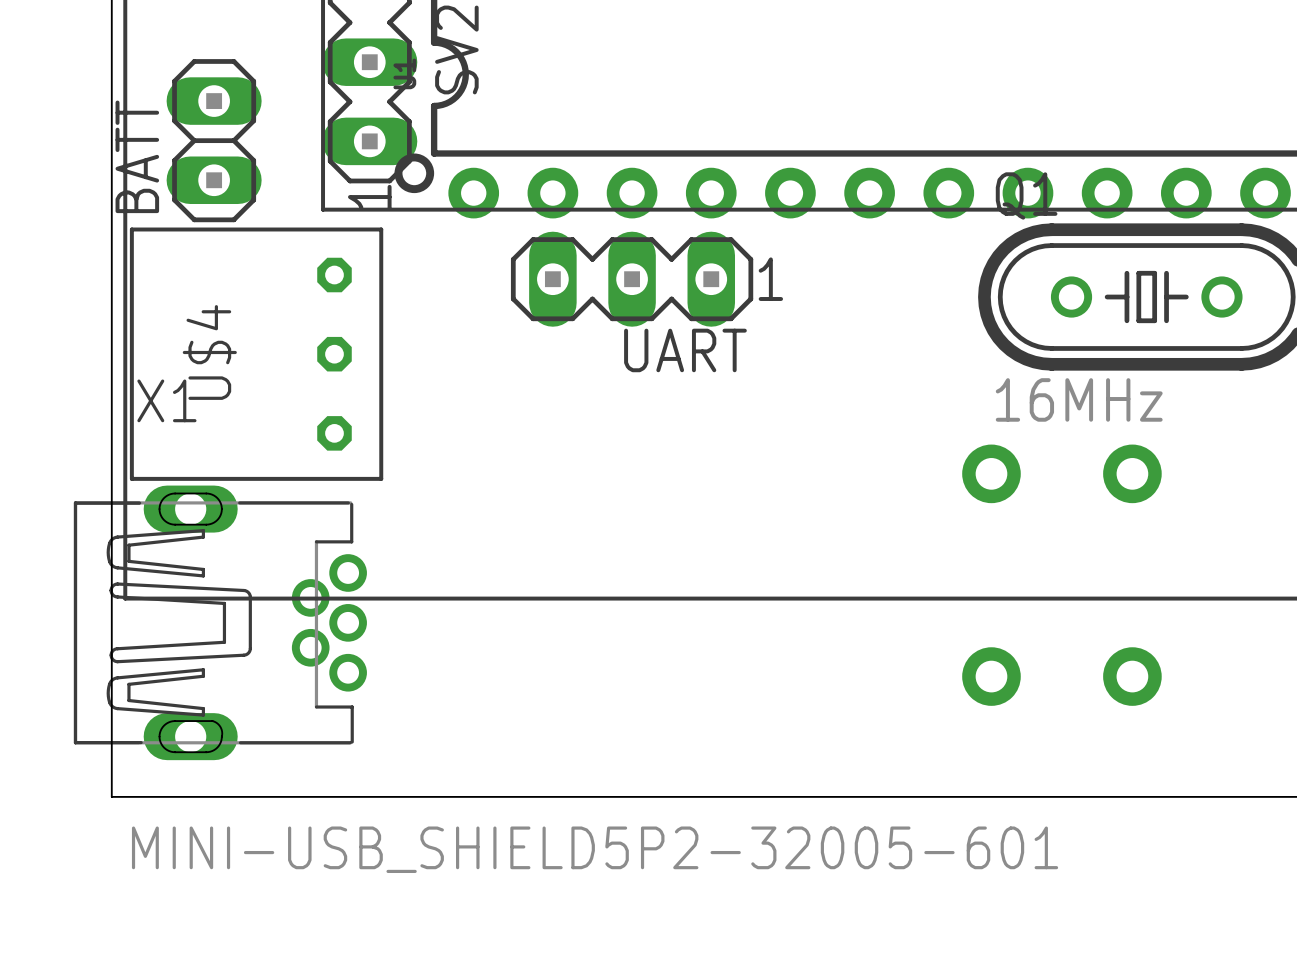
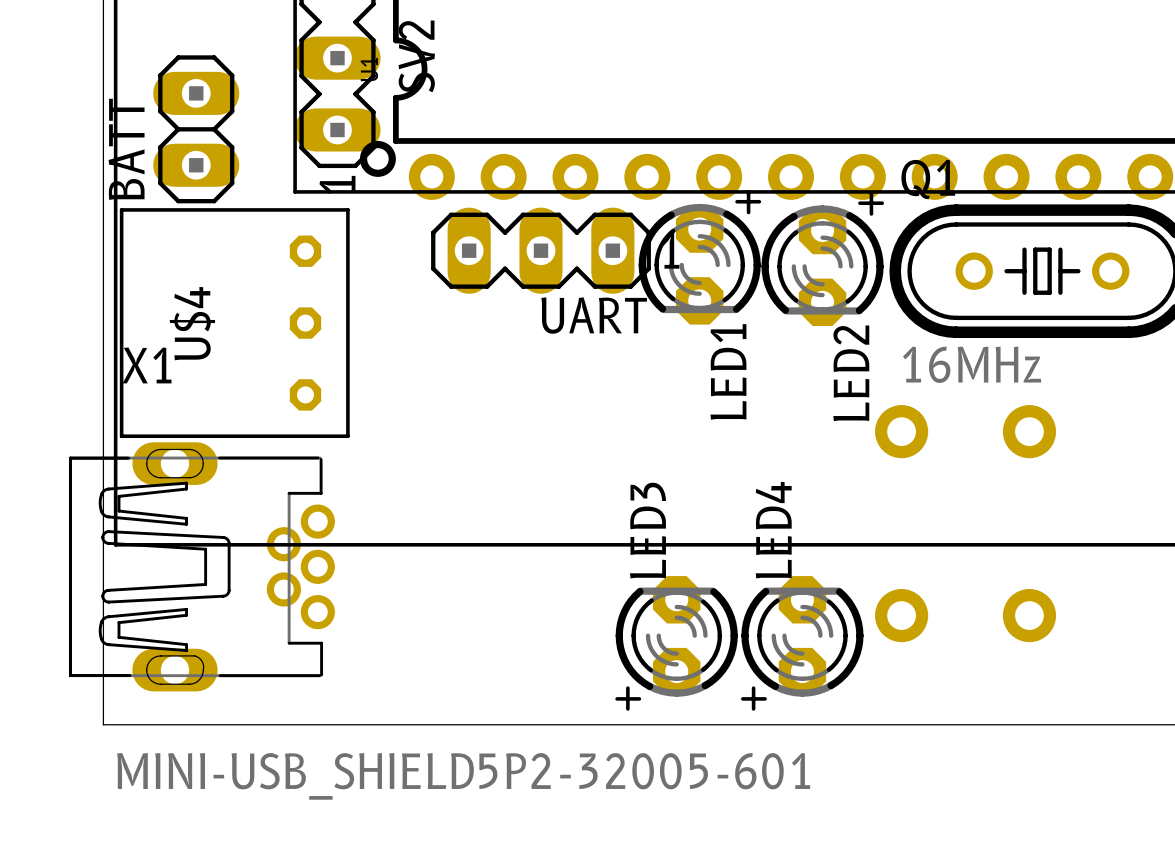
UART position: (632, 279) -> (541, 250)
LED1: none -> (699, 257)
LED2: none -> (822, 258)
LED3: none -> (676, 643)
LED4: none -> (802, 643)

